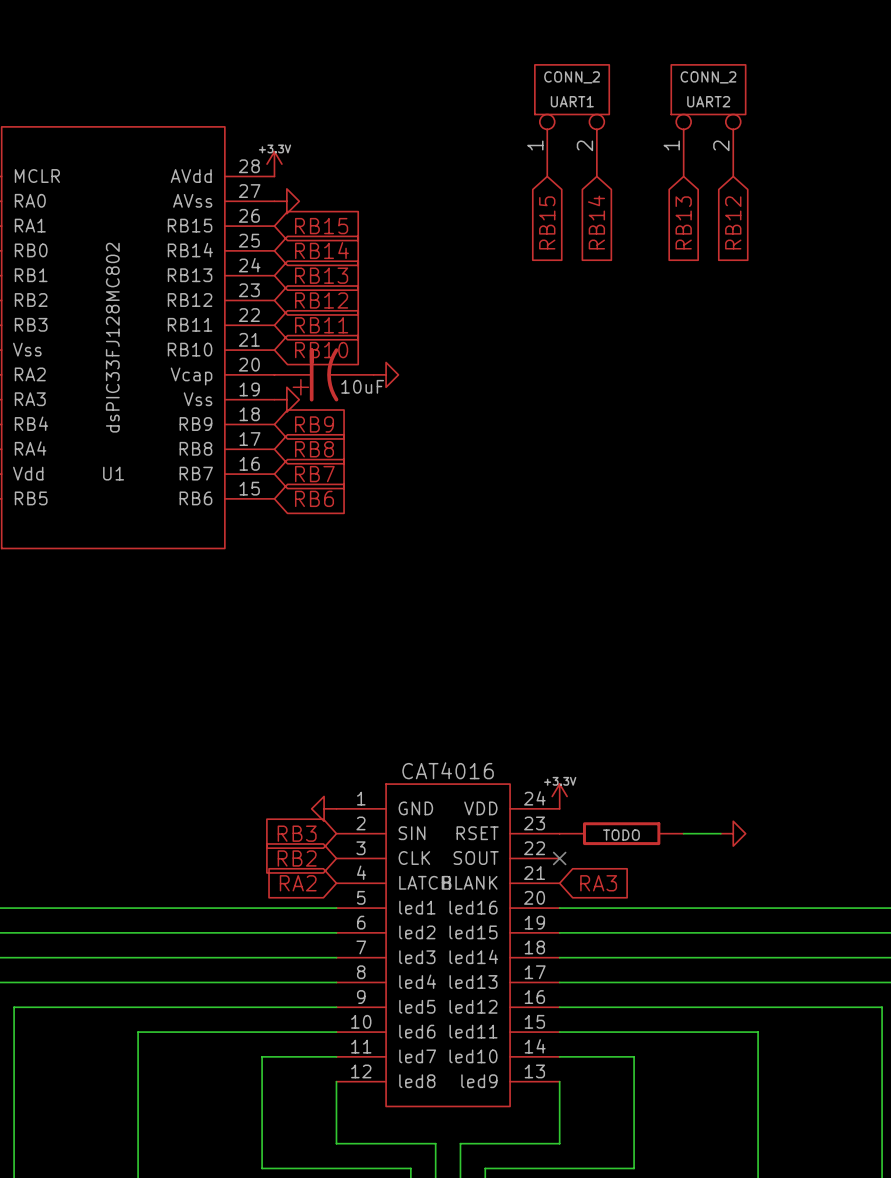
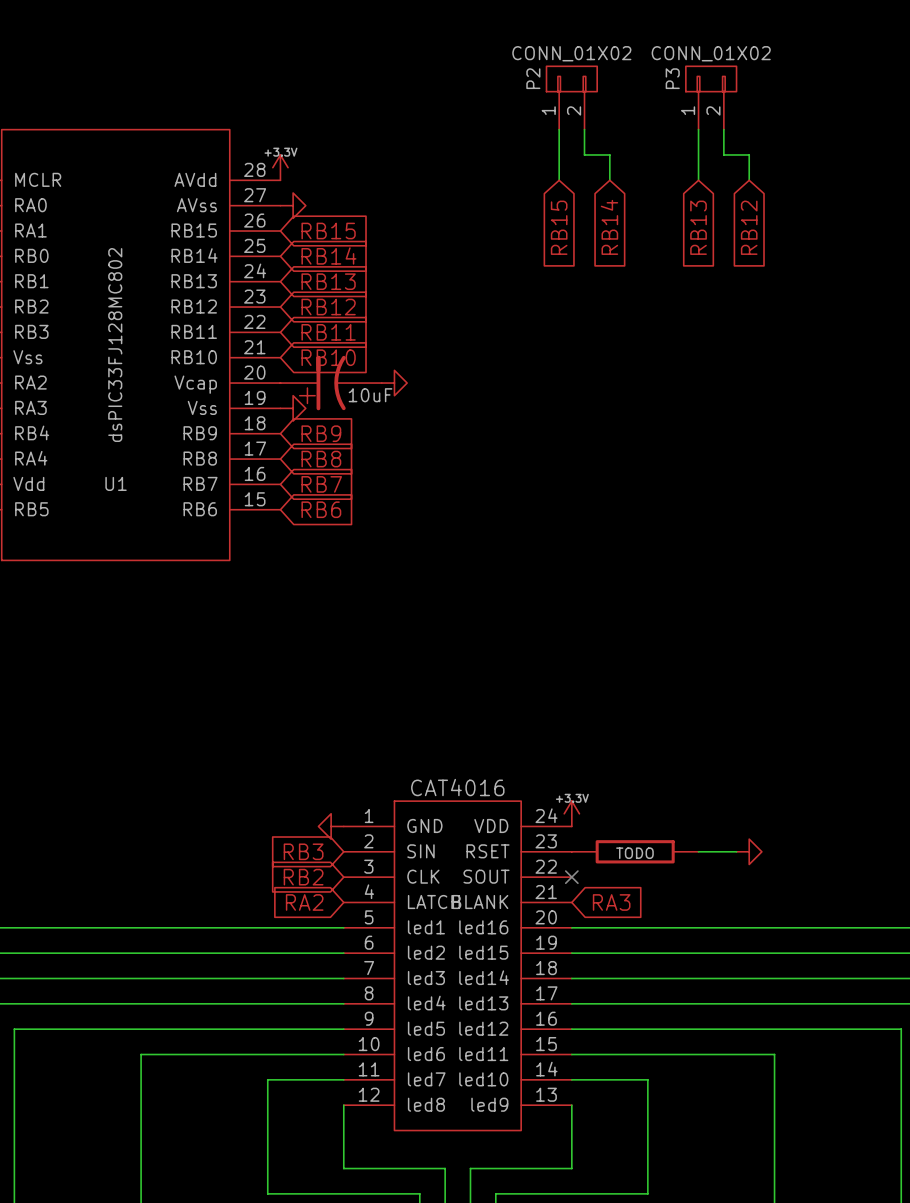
P2: none -> CONN_01X02 (571, 97)
P3: none -> CONN_01X02 (711, 97)
UART1: CONN_2 (572, 120) -> none
UART2: CONN_2 (708, 120) -> none
wire: none -> (584, 129) (584, 154) (609, 154) (609, 180)
wire: none -> (723, 129) (723, 154) (749, 154) (749, 180)

